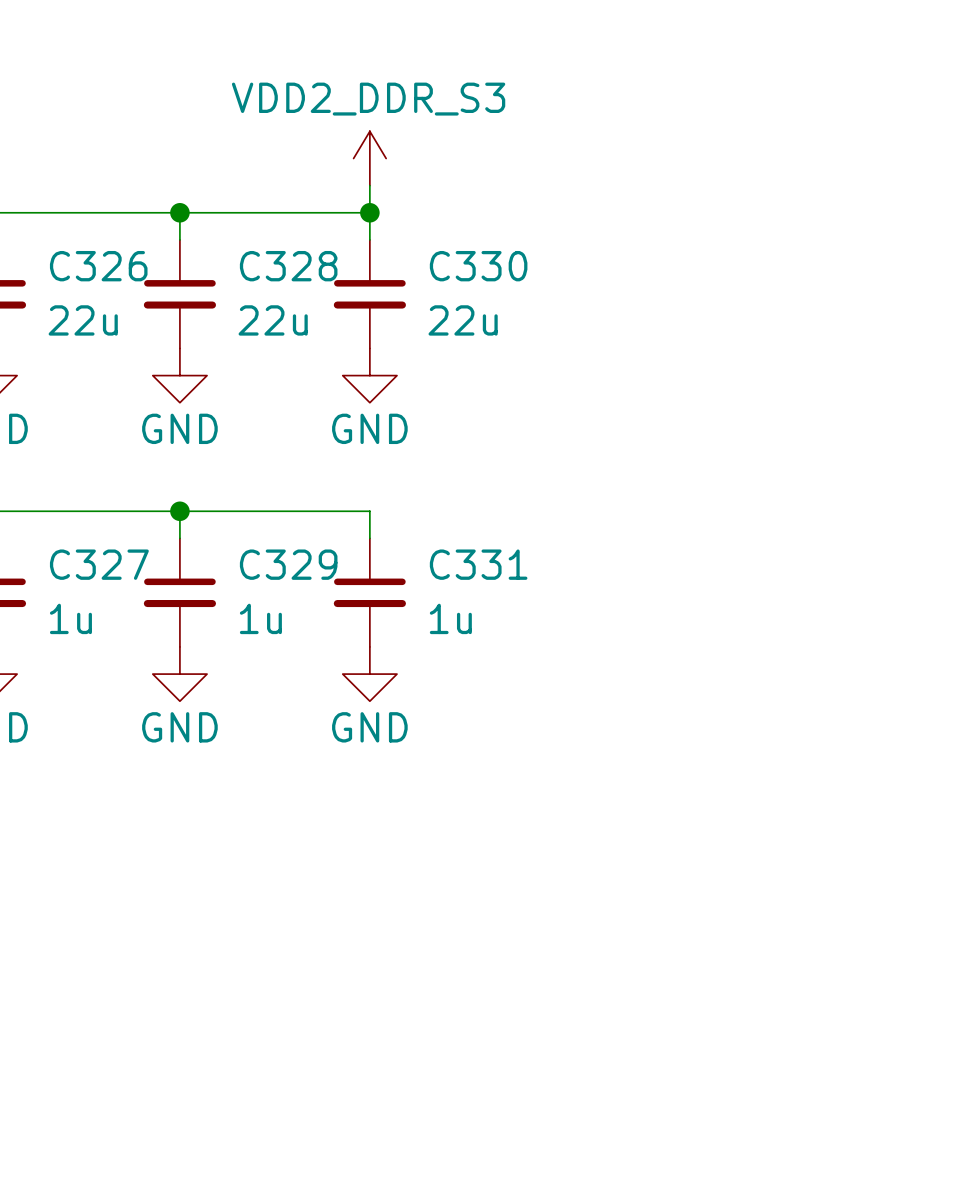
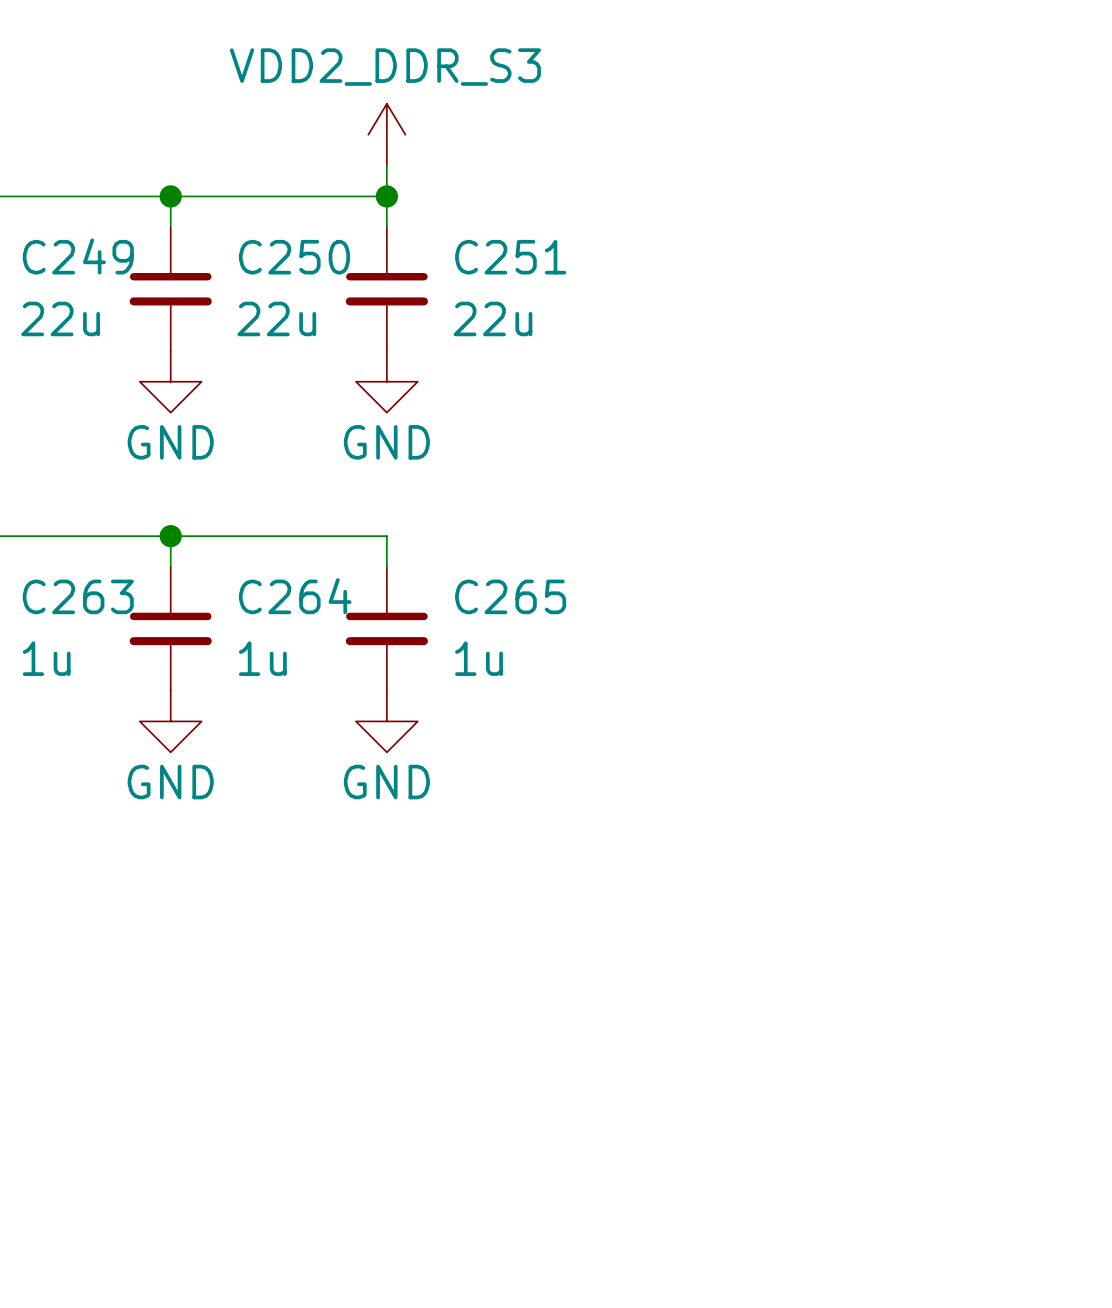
C326 name: C326 (98, 266) -> C249 (78, 256)
C328 name: C328 (288, 266) -> C250 (294, 257)
C330 name: C330 (478, 266) -> C251 (510, 257)
C327 name: C327 (99, 564) -> C263 (78, 596)
C329 name: C329 (288, 564) -> C264 (295, 596)
C331 name: C331 (478, 564) -> C265 (510, 596)

